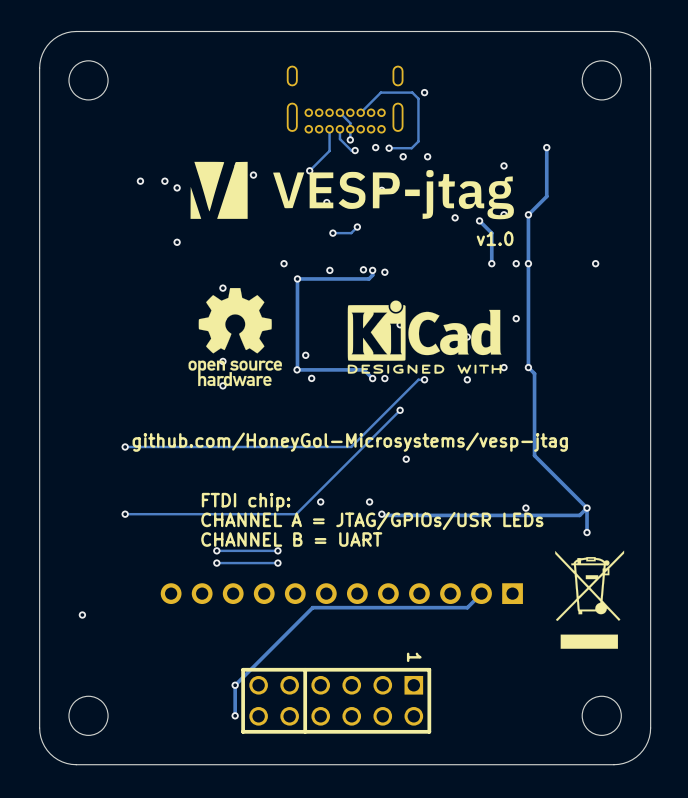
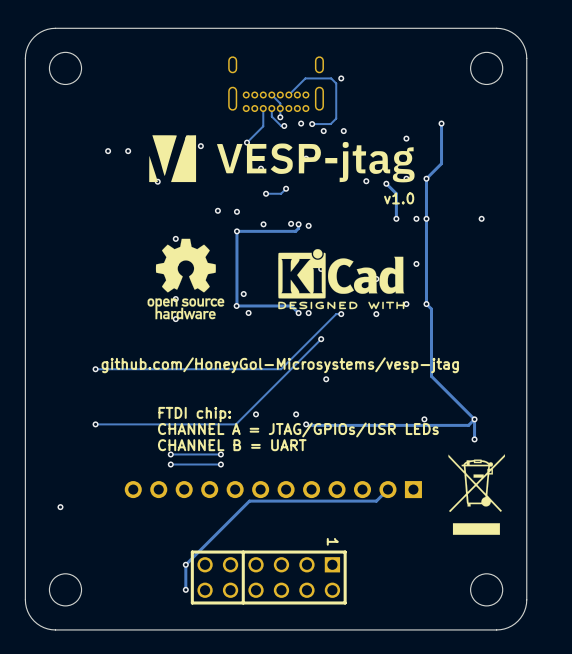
via: (177, 187) -> none
via: none -> (157, 181)
via: (177, 242) -> none
via: none -> (217, 210)
via: none -> (236, 211)
via: (284, 263) -> none

